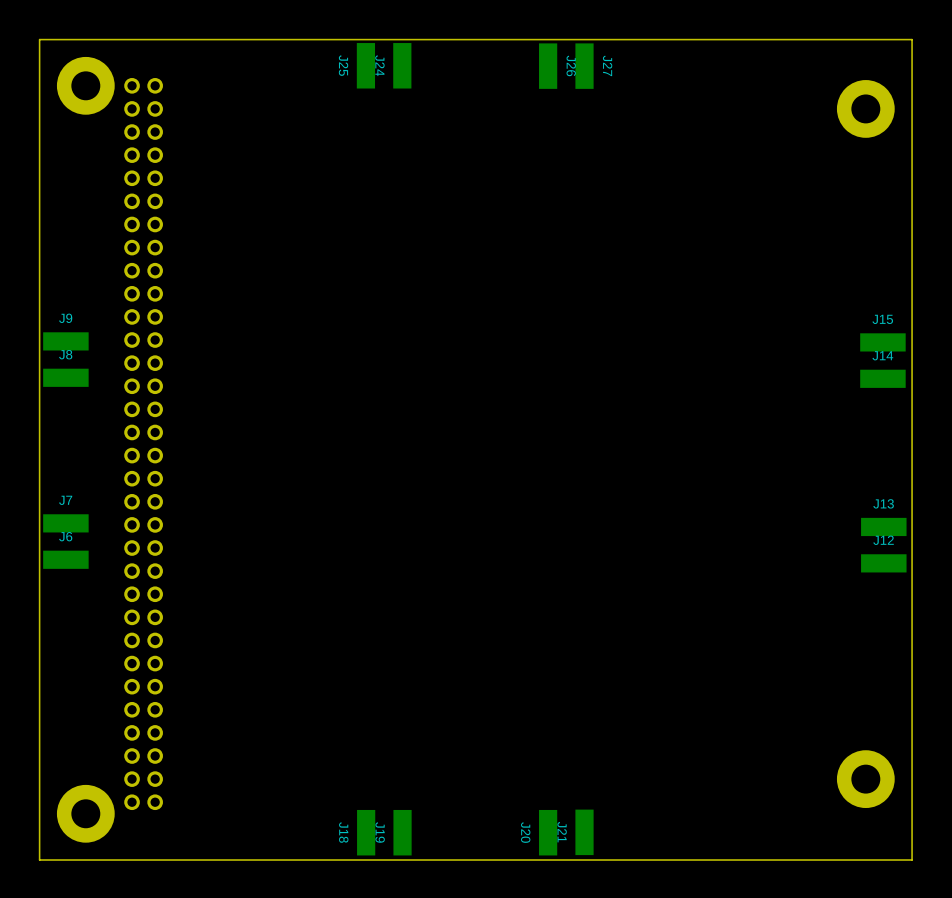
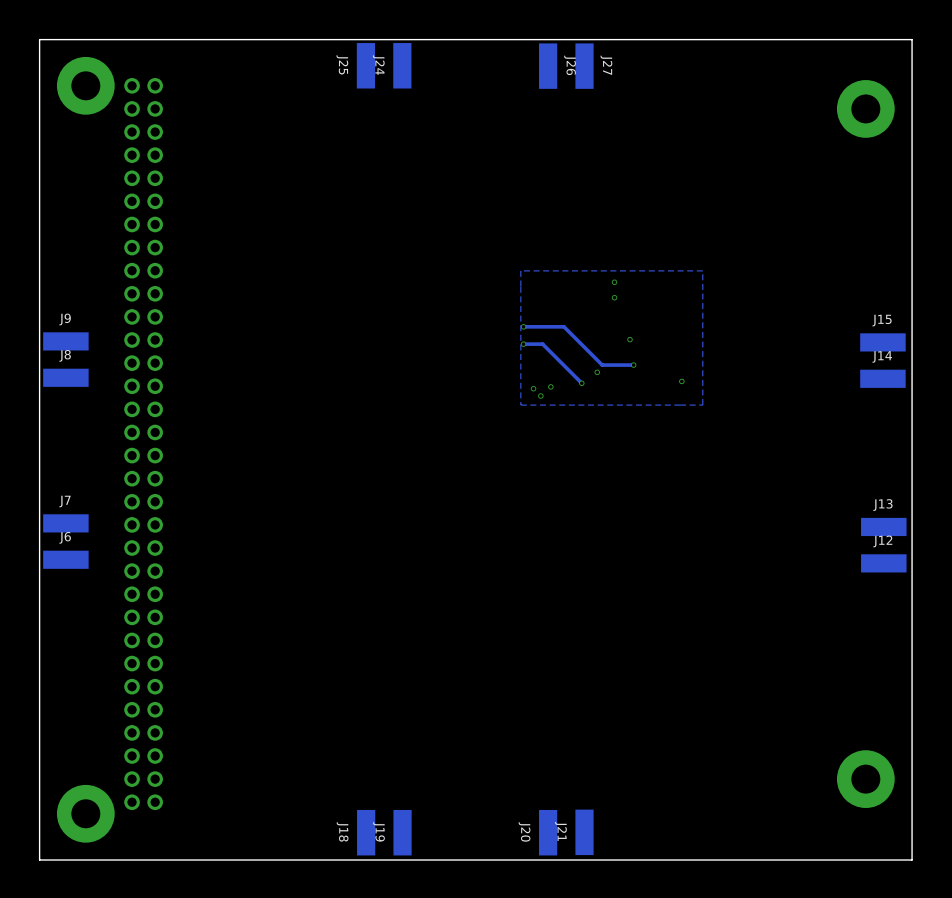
zone outline: none -> (702, 270) (520, 270) (520, 405) (702, 405) (702, 270)
via: none -> (614, 282)
via: none -> (614, 297)
track: none -> (523, 326) (564, 326) (602, 365) (633, 365)
via: none -> (523, 326)
via: none -> (630, 339)
track: none -> (523, 344) (542, 344) (581, 383)
via: none -> (523, 344)
via: none -> (633, 365)
via: none -> (597, 372)
via: none -> (681, 381)
via: none -> (581, 383)
via: none -> (550, 386)
via: none -> (533, 388)
via: none -> (540, 395)

